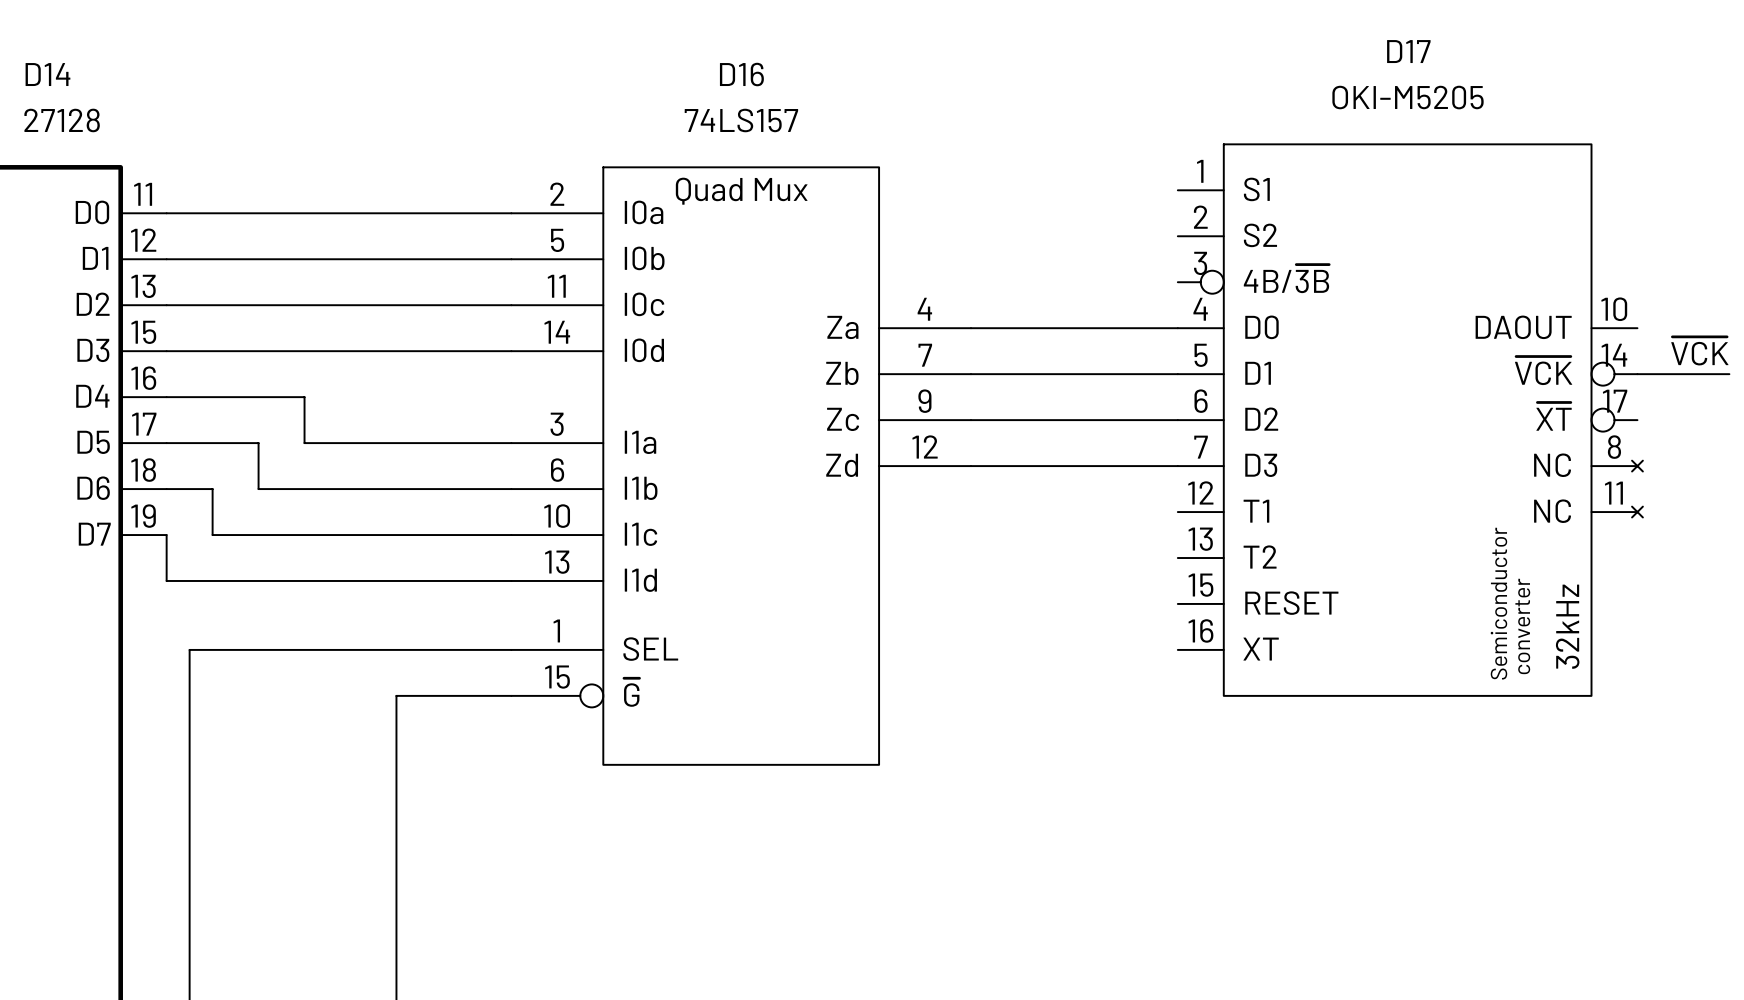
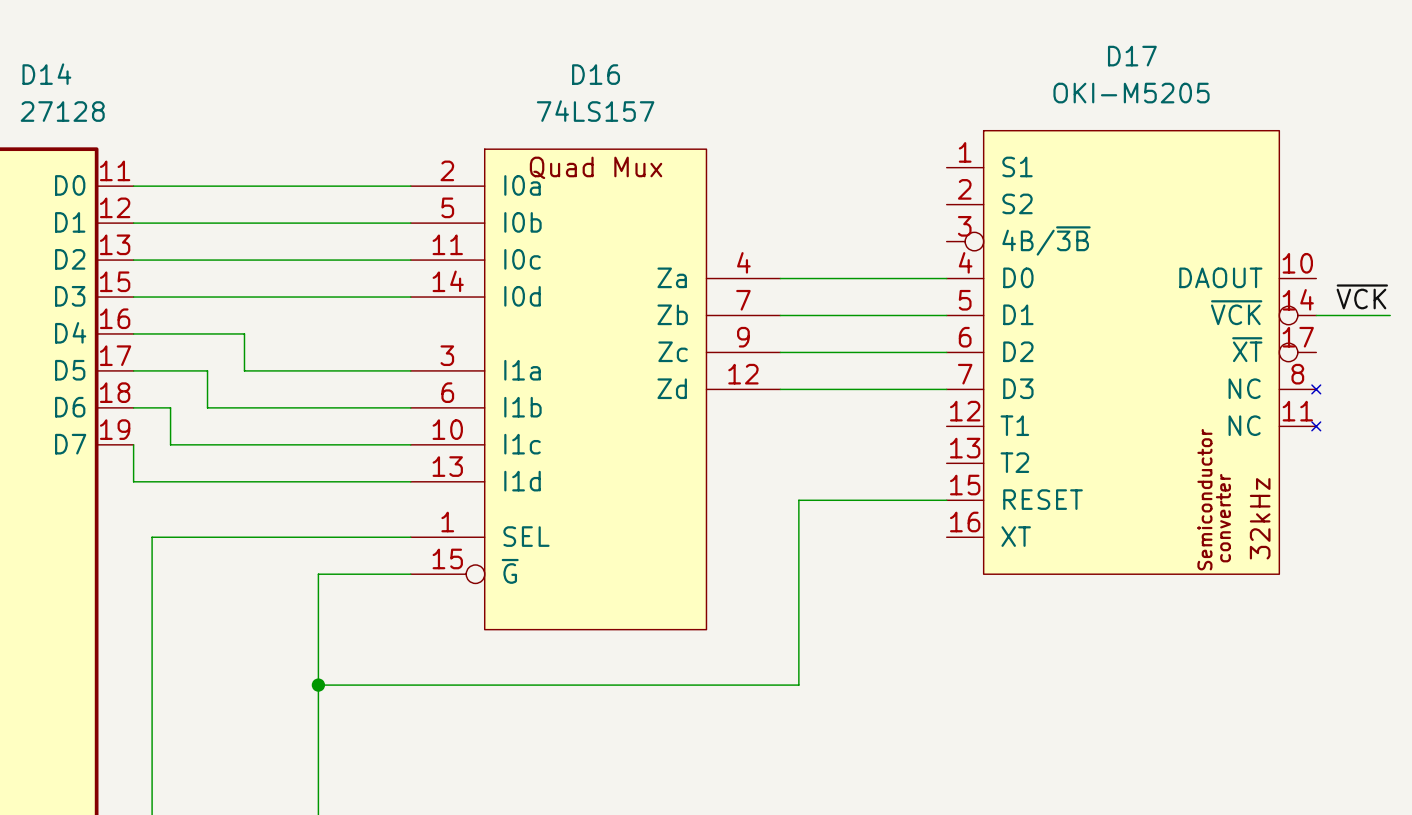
wire: none -> (946, 500) (798, 500) (798, 685) (318, 685)
junction: none -> (318, 685)

